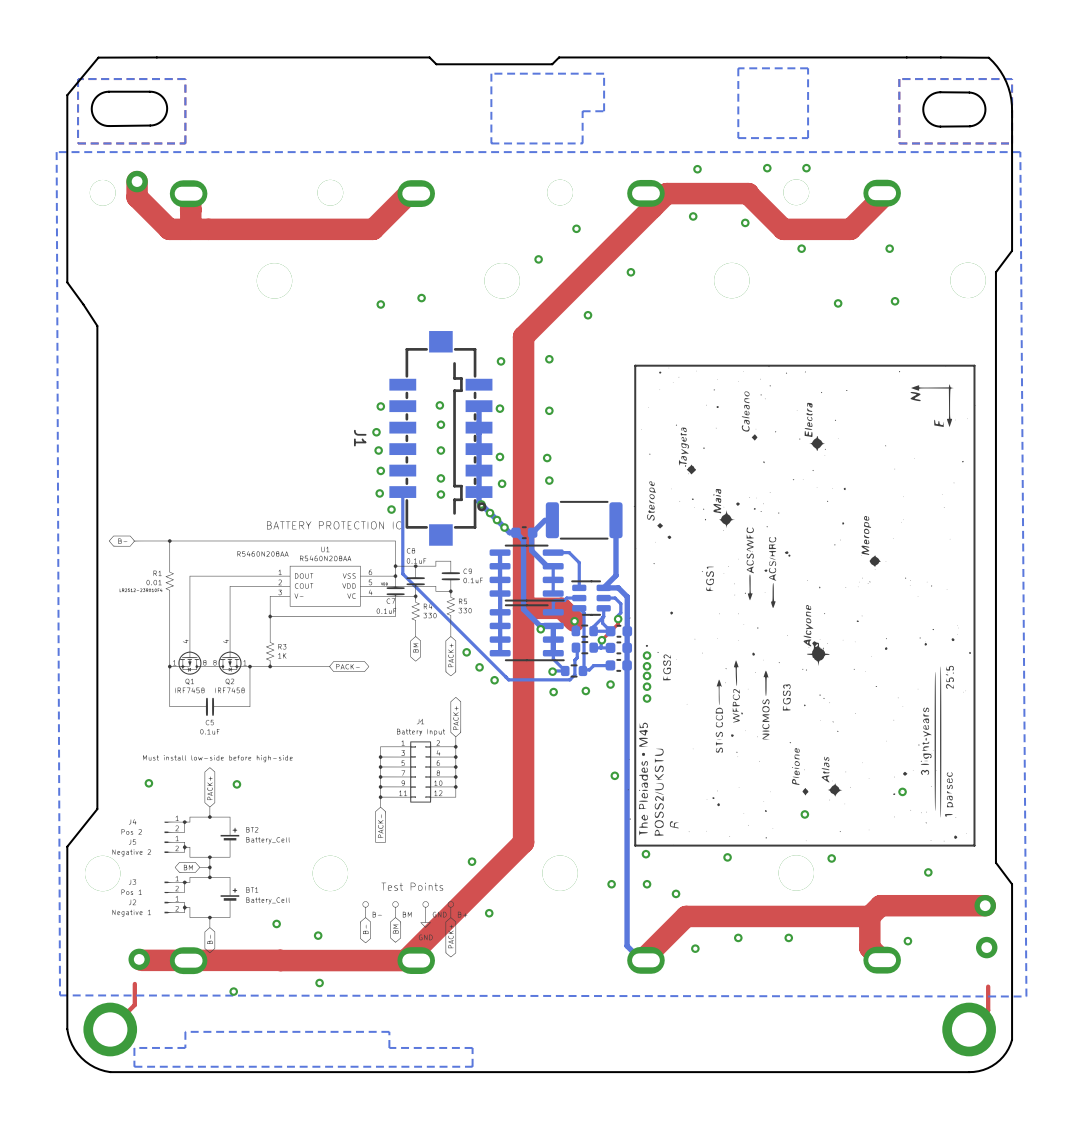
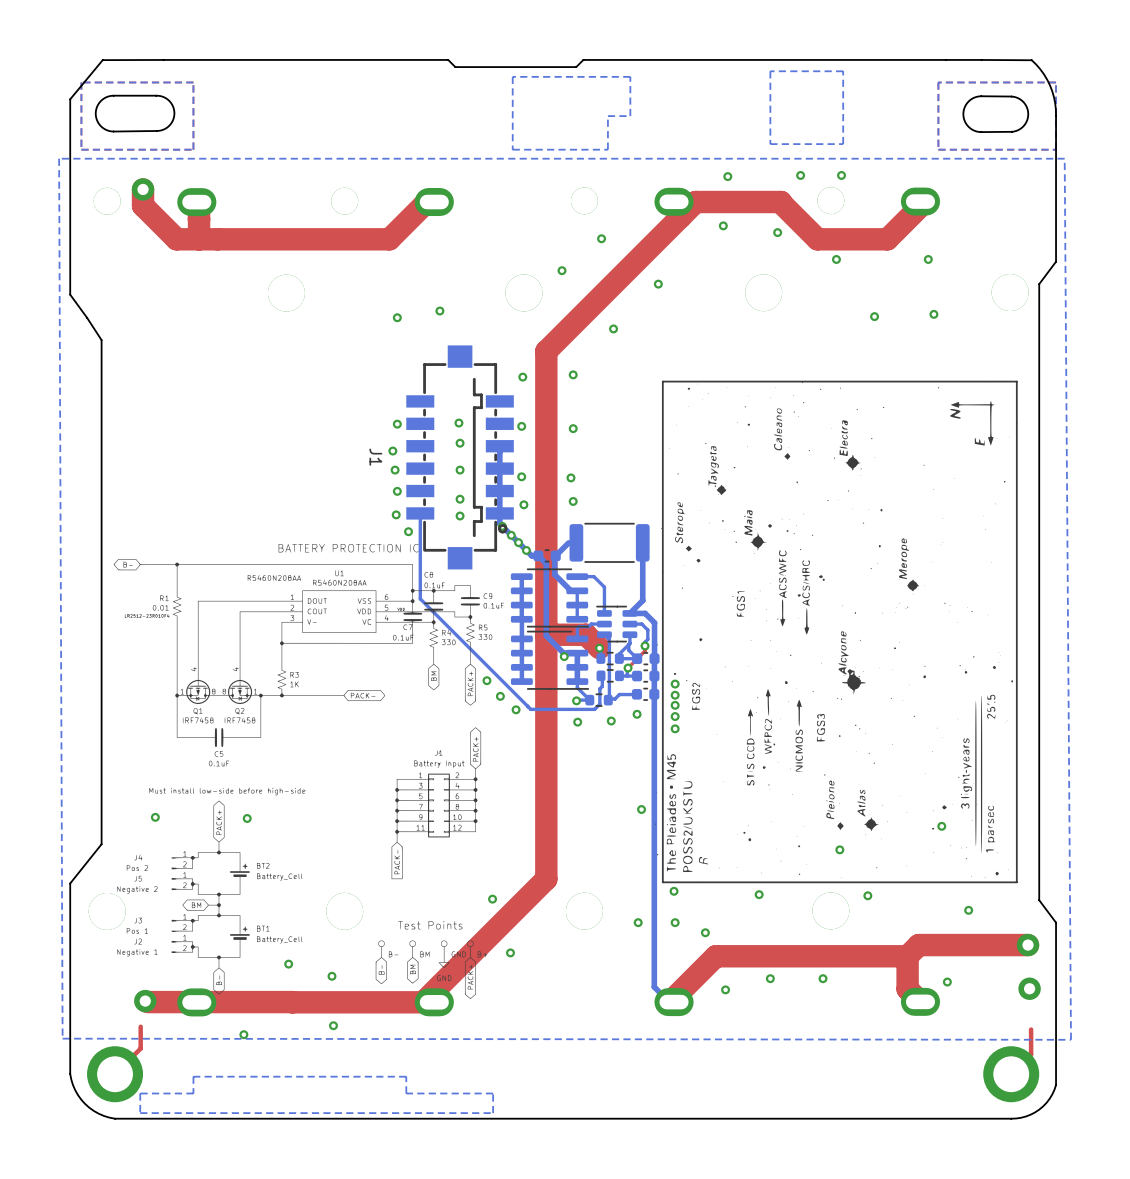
bottom track: (479, 406) (479, 427) -> none

